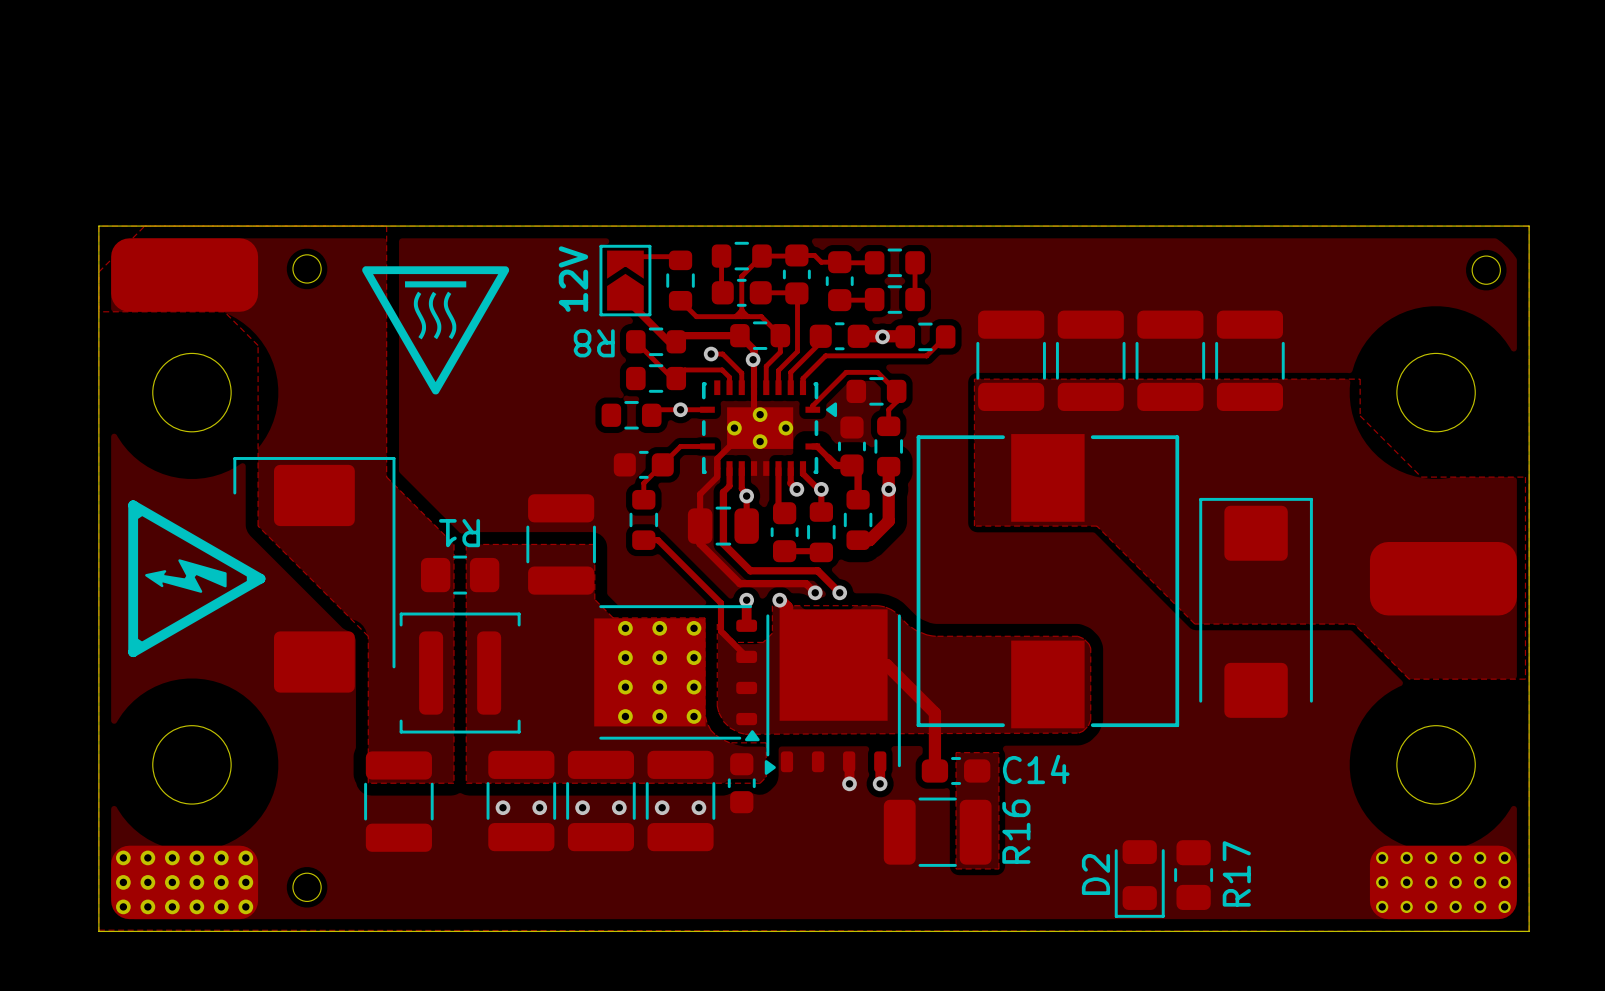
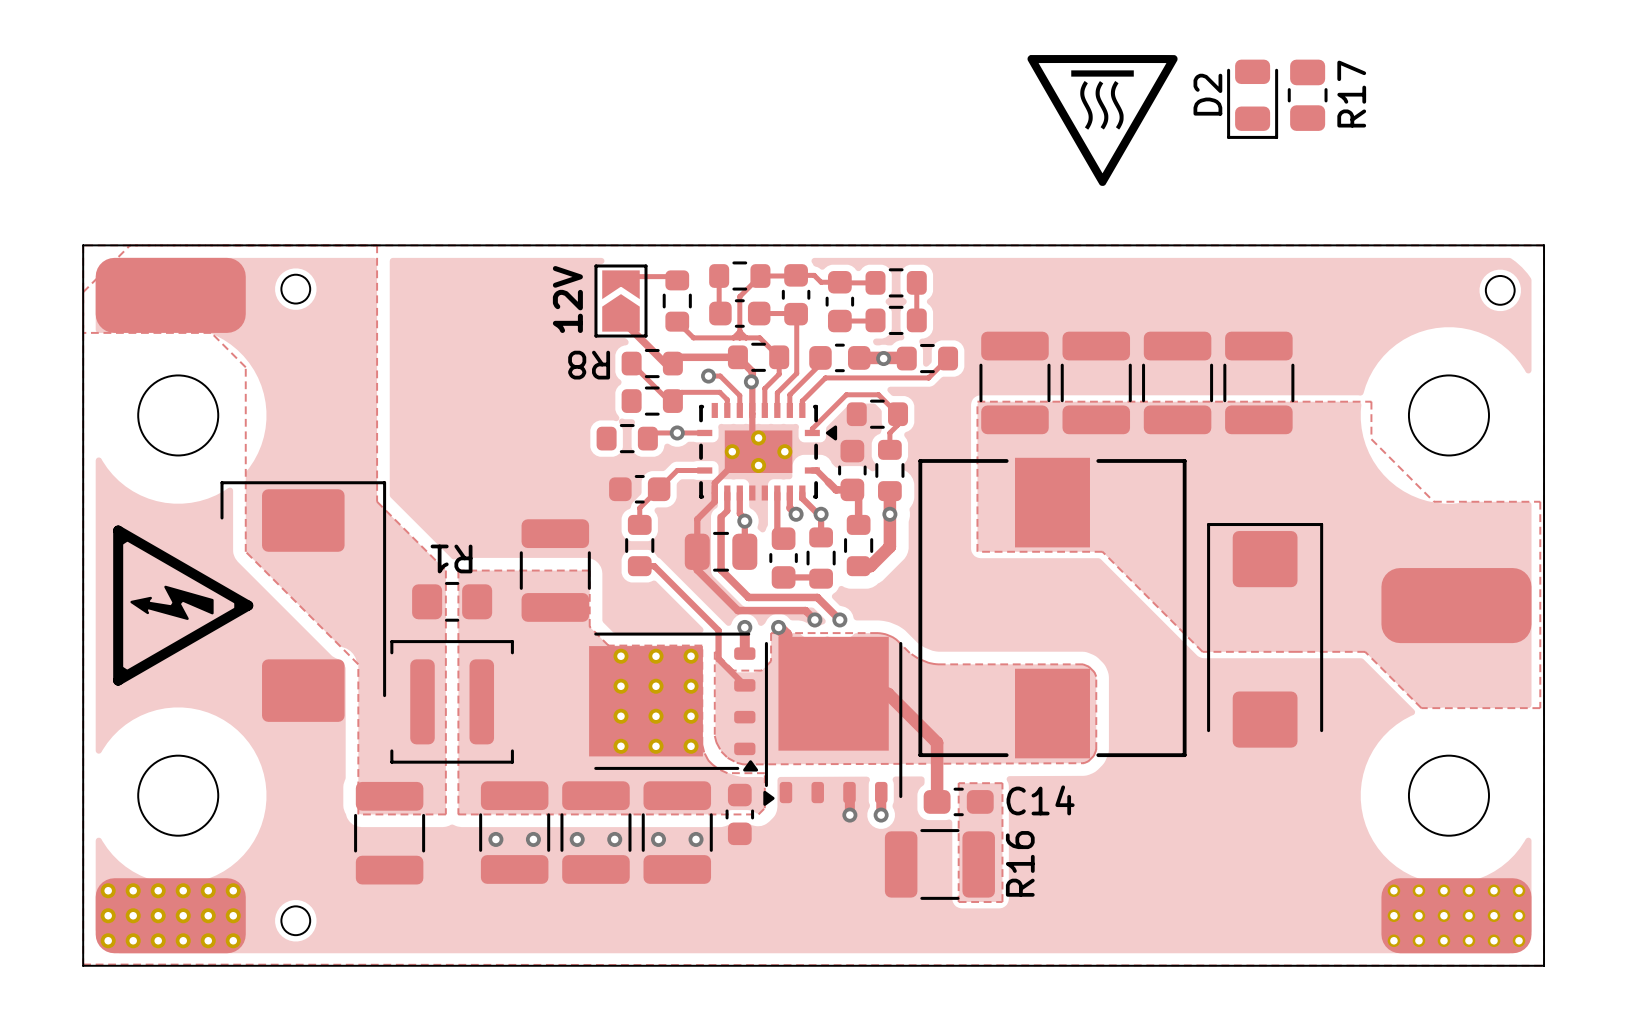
drawing: none -> [1027, 55, 1178, 186]
drawing: [362, 266, 510, 395] -> none
R17 position: (1193, 875) -> (1307, 95)
D2 position: (1139, 878) -> (1252, 99)

